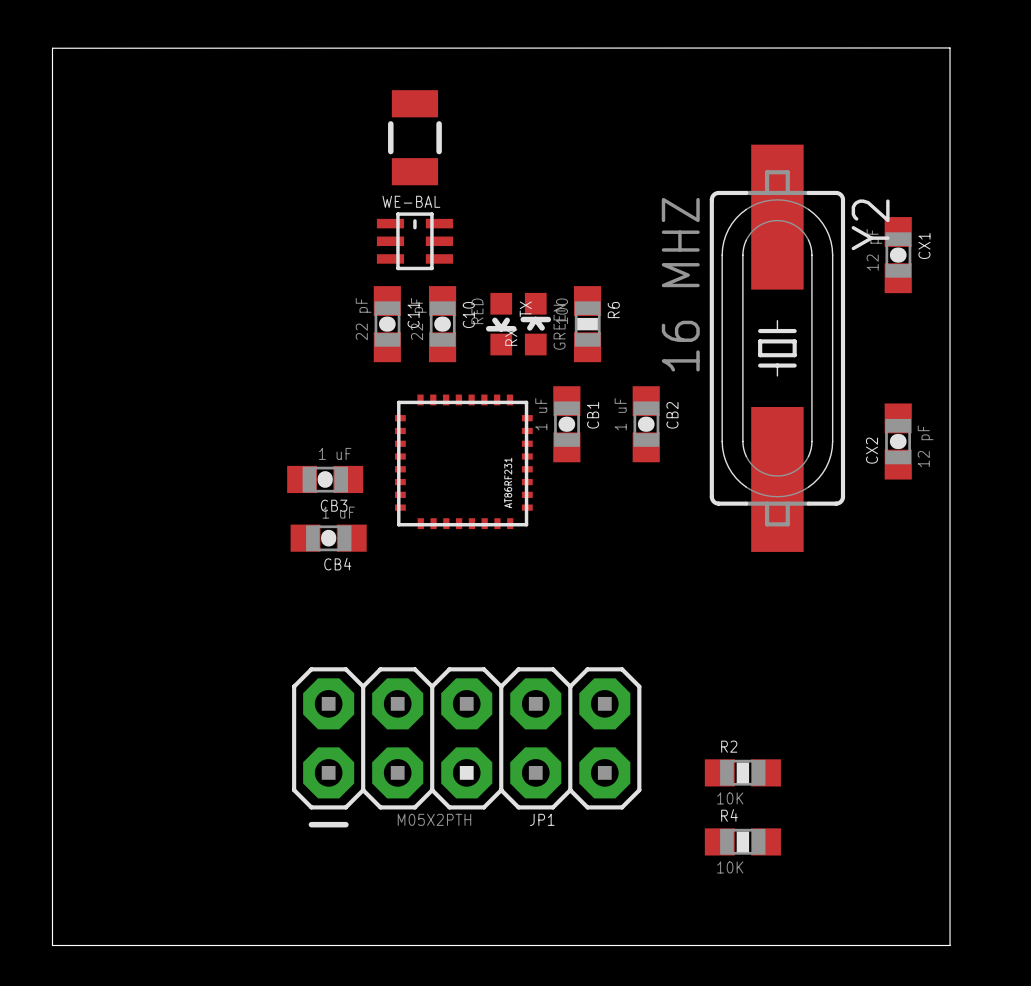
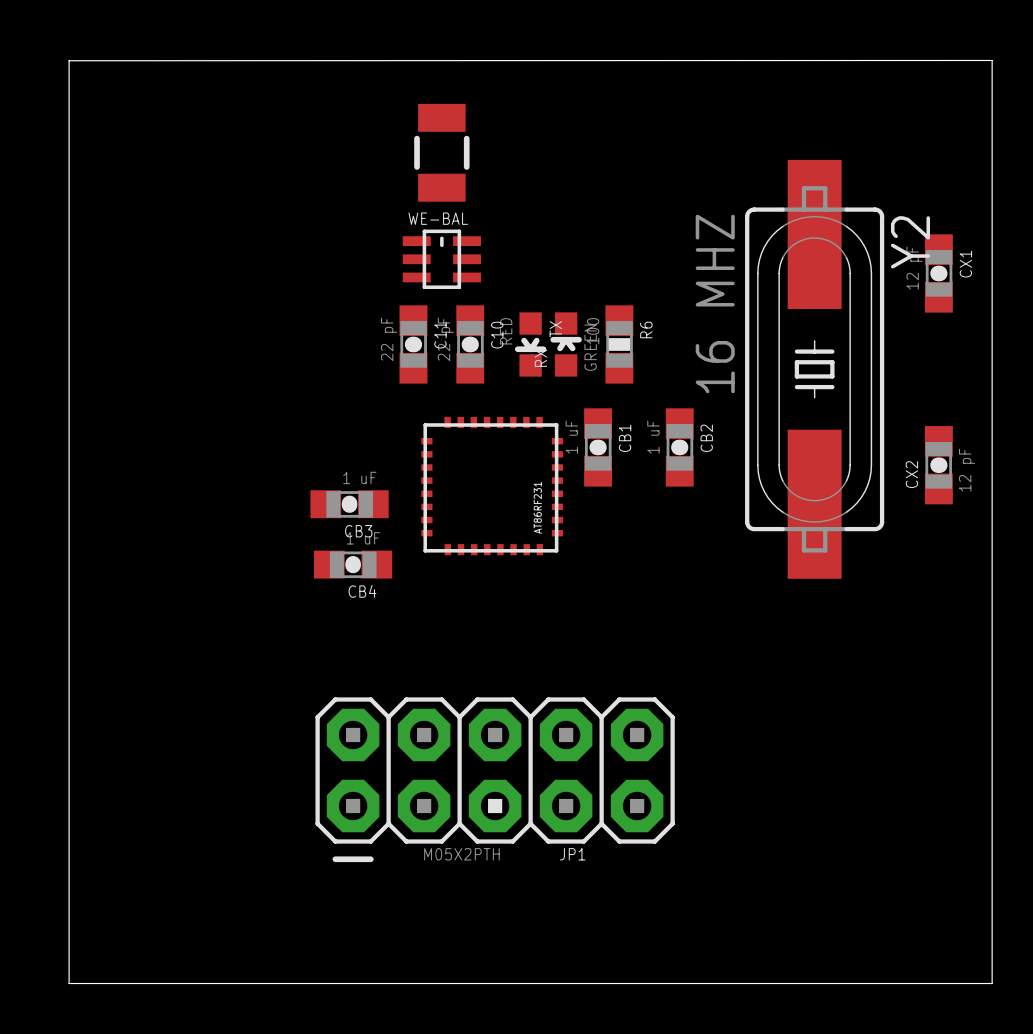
R2: 10K (742, 772) -> none
R4: 10K (742, 841) -> none

